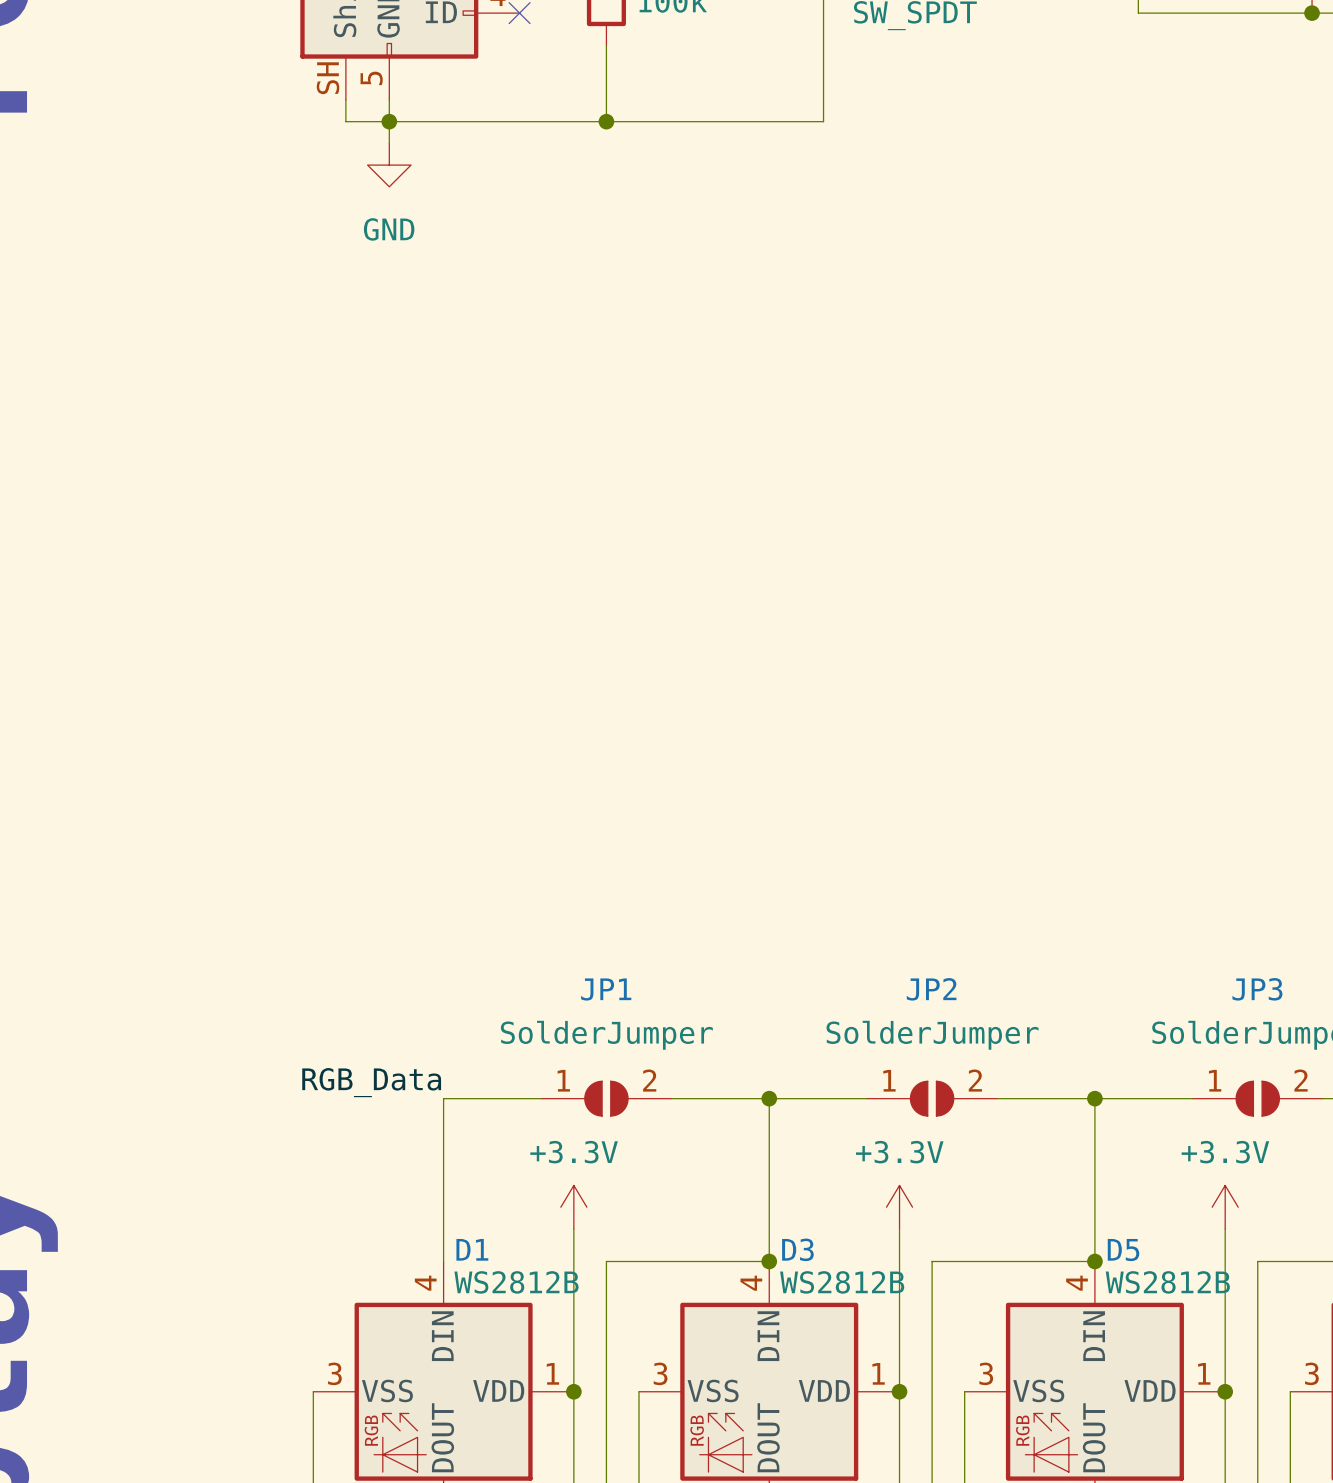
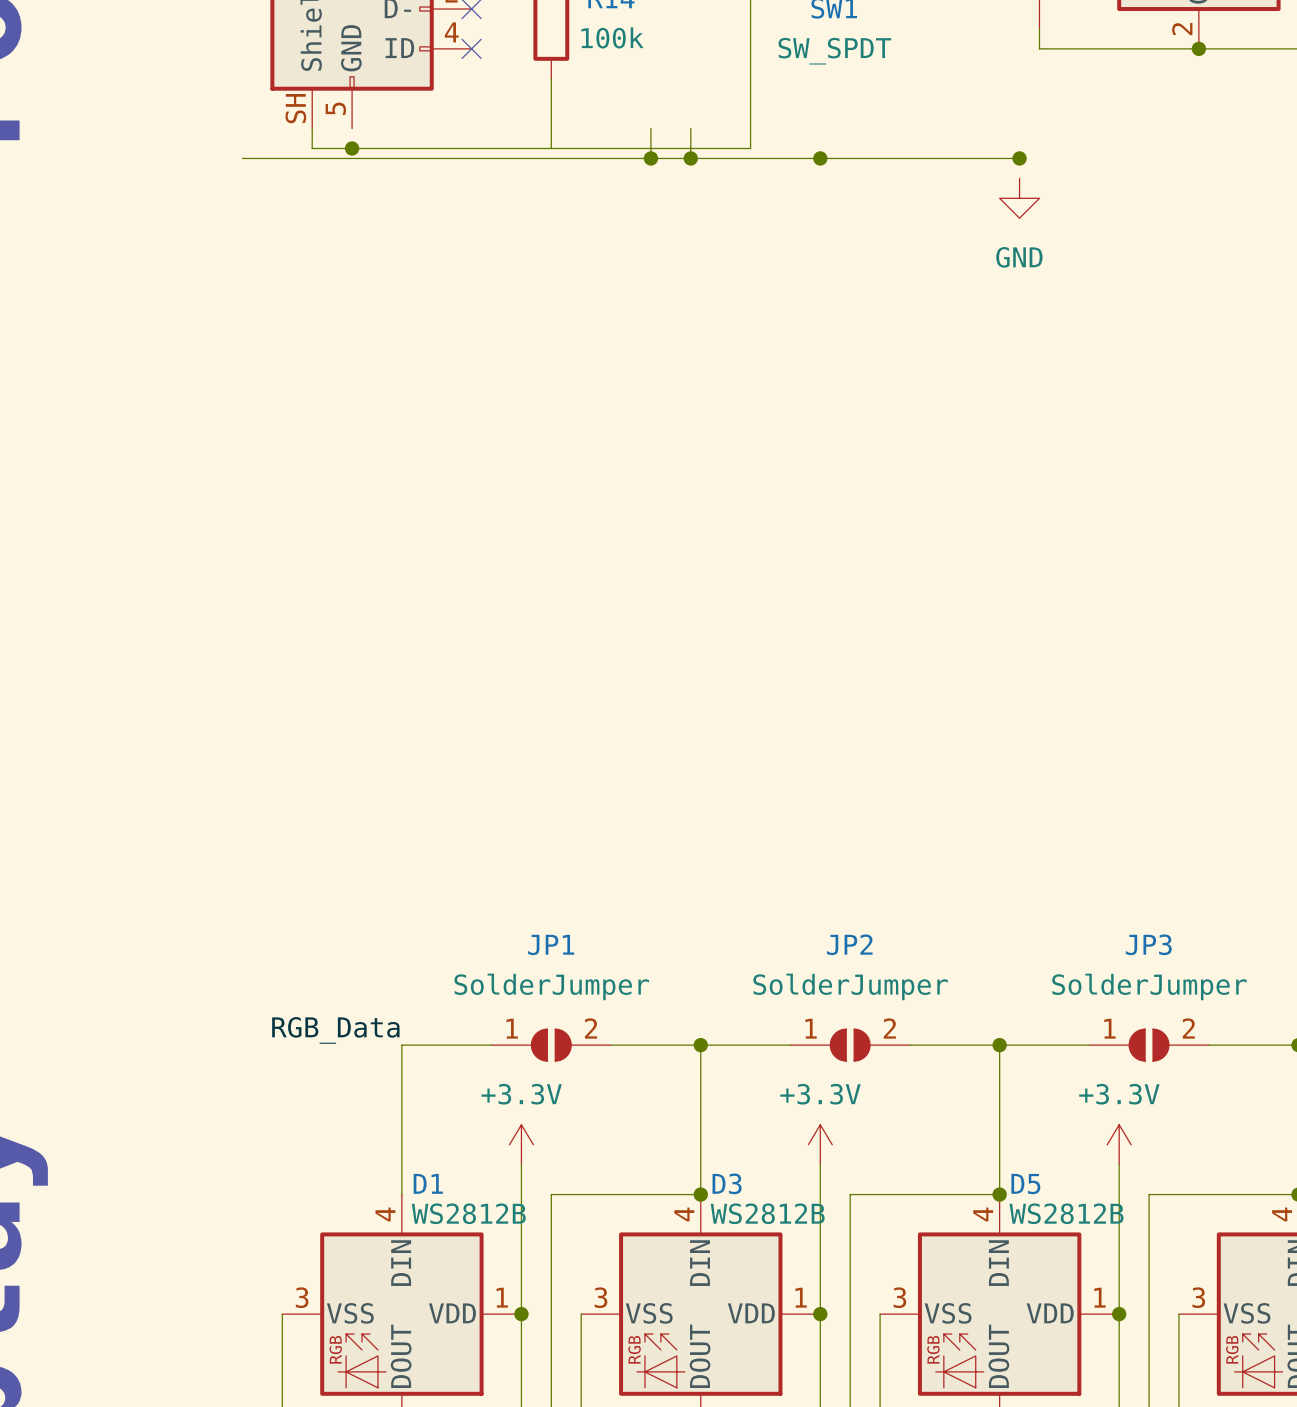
wire: (389, 99) (389, 143) -> none
wire: none -> (650, 128) (650, 158)
wire: none -> (690, 128) (690, 158)
junction: (606, 121) -> none
wire: none -> (242, 158) (1019, 158)
junction: none -> (650, 158)
junction: none -> (690, 158)
junction: none -> (820, 158)
junction: none -> (1019, 158)
power symbol: GND (389, 165) -> none
power symbol: none -> GND (1019, 198)

